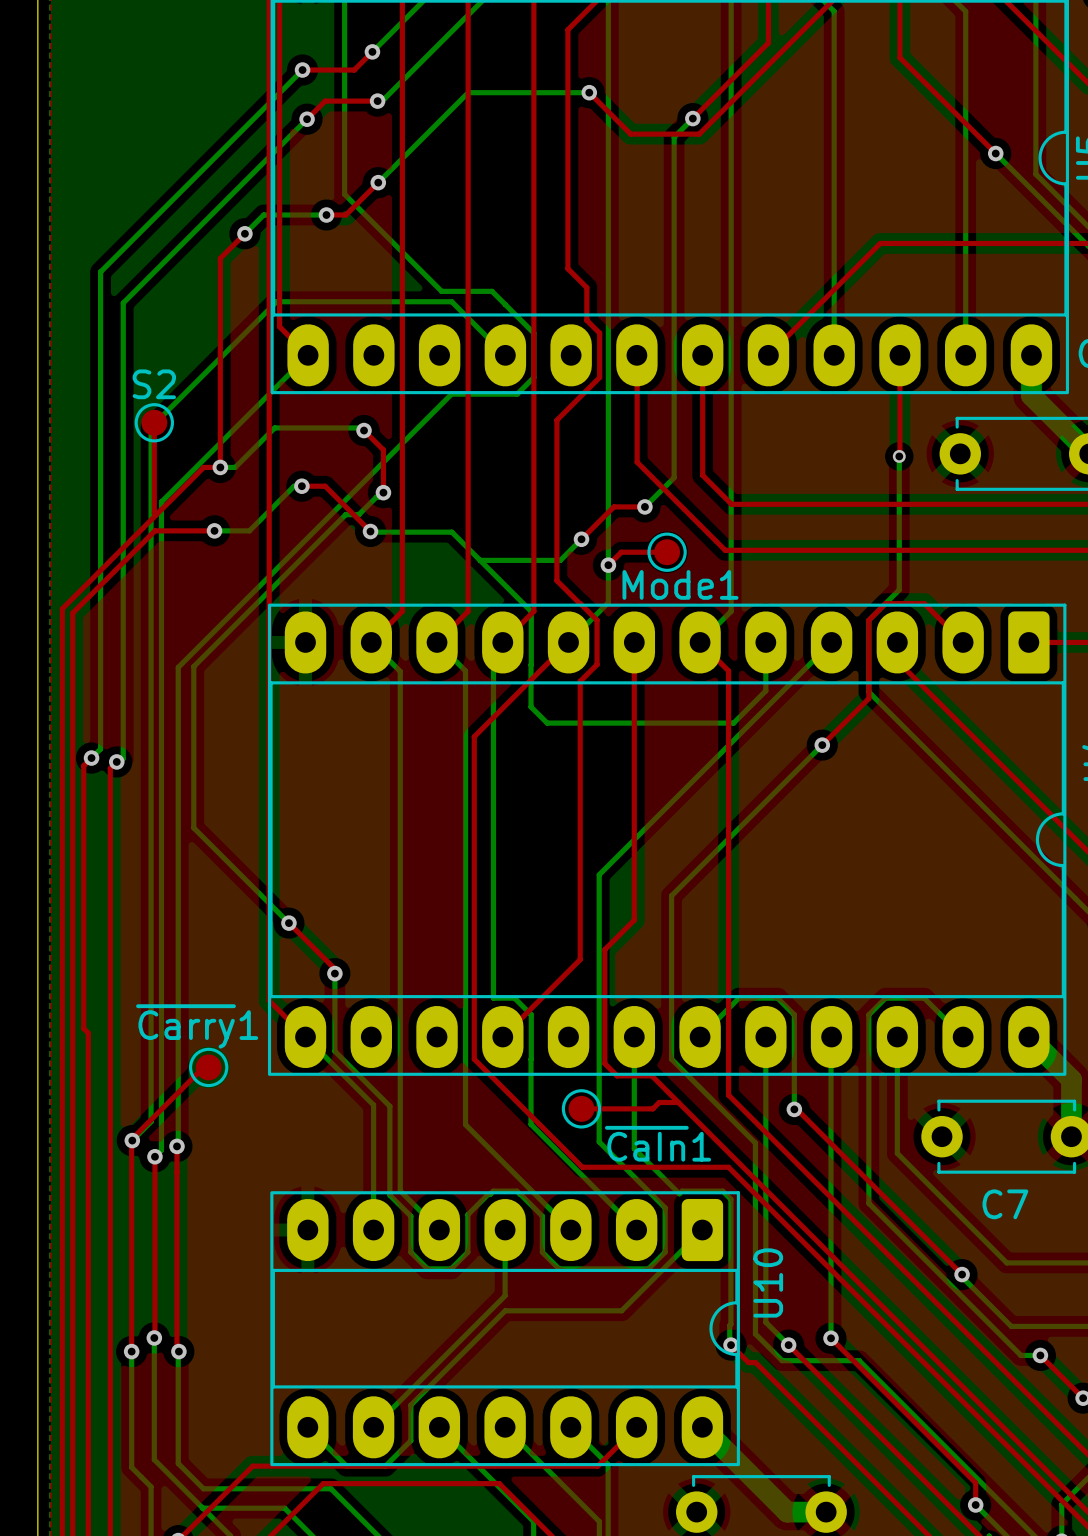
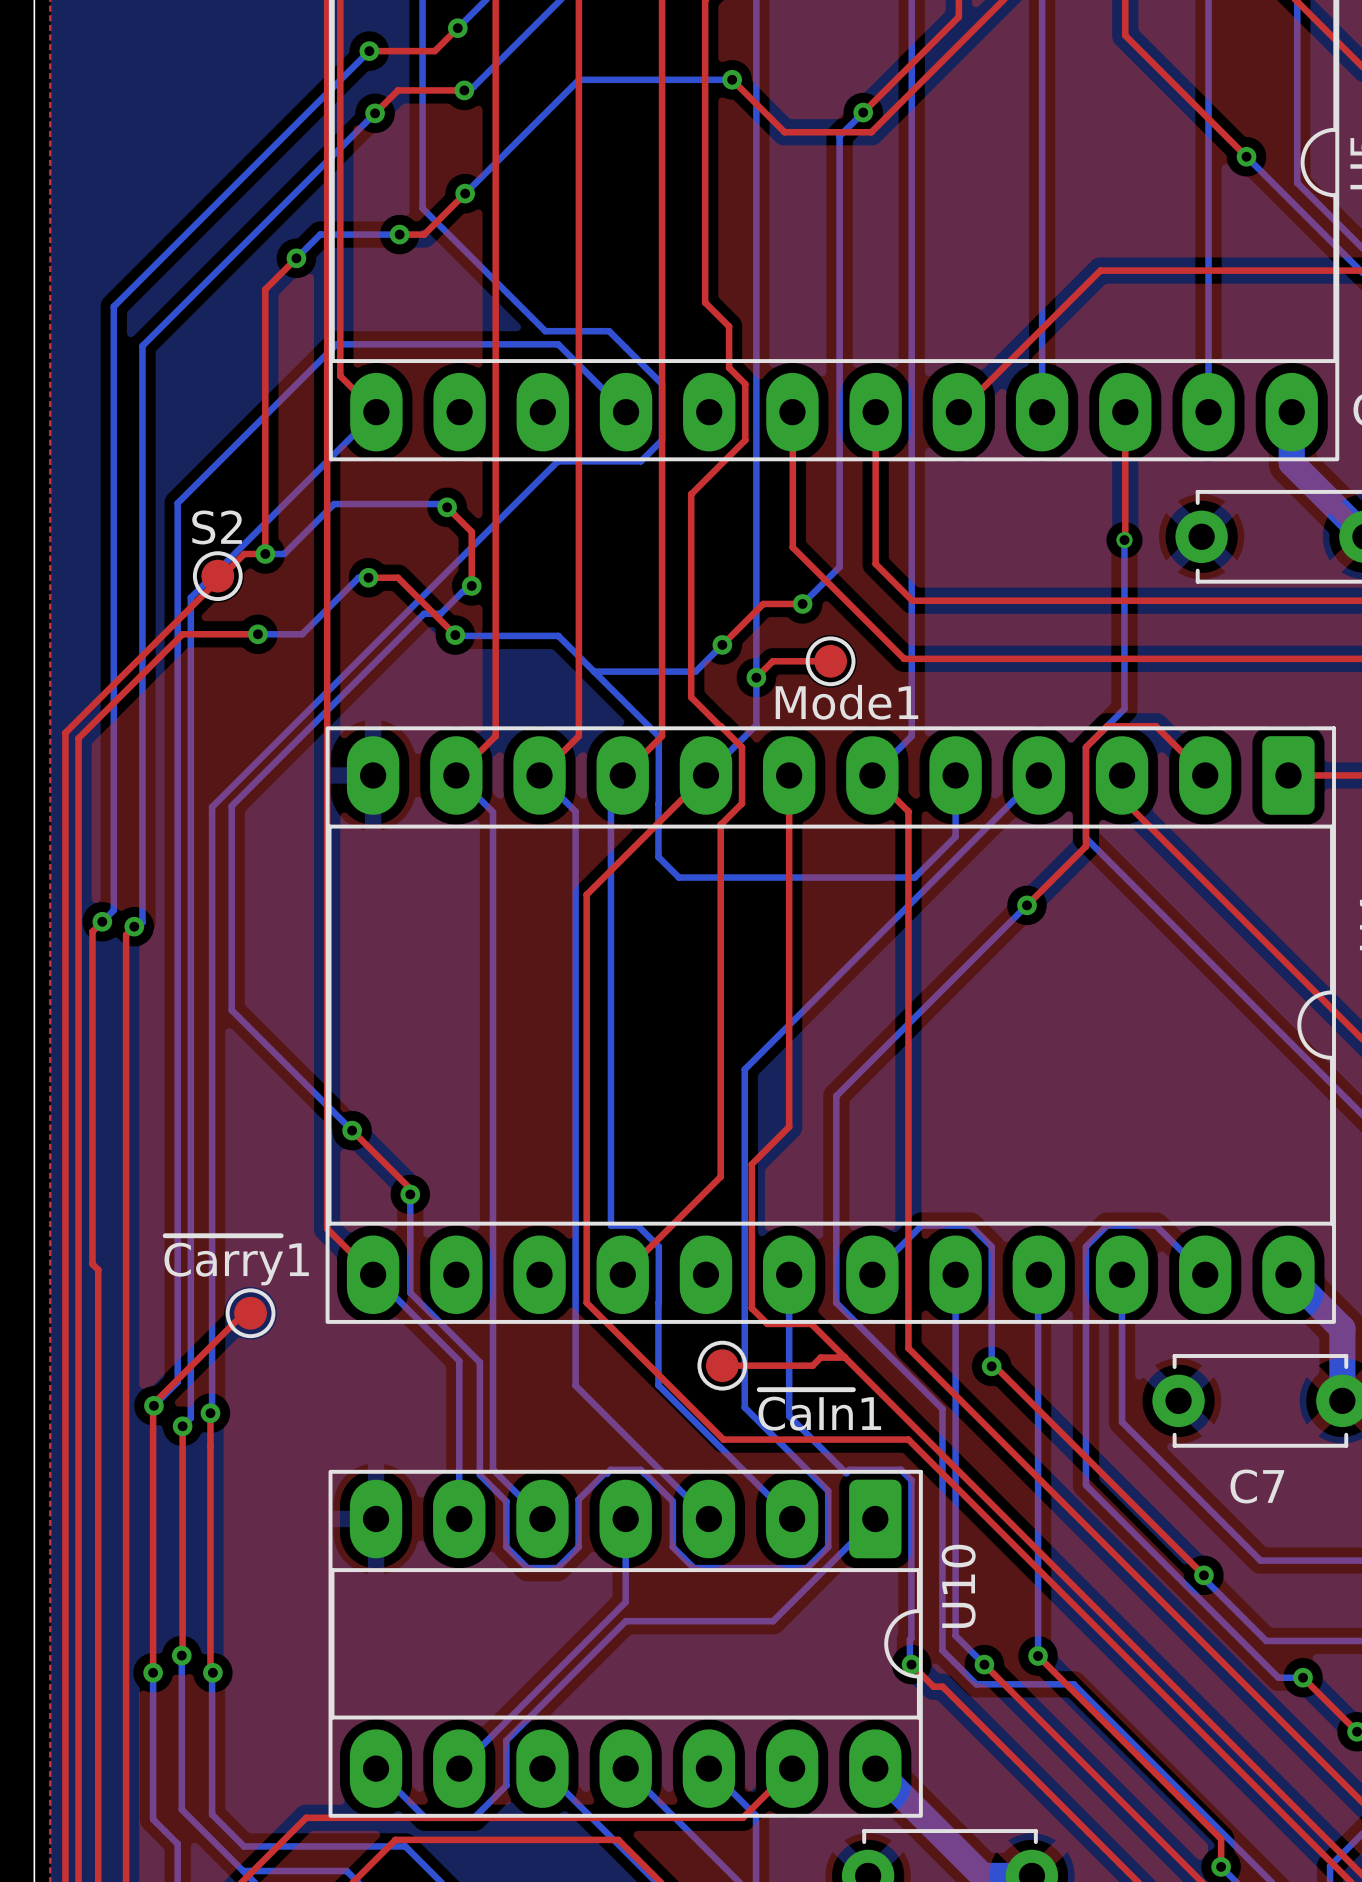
top track: (154, 422) (154, 513) (156, 515) -> none
S2 position: (154, 422) -> (217, 576)

